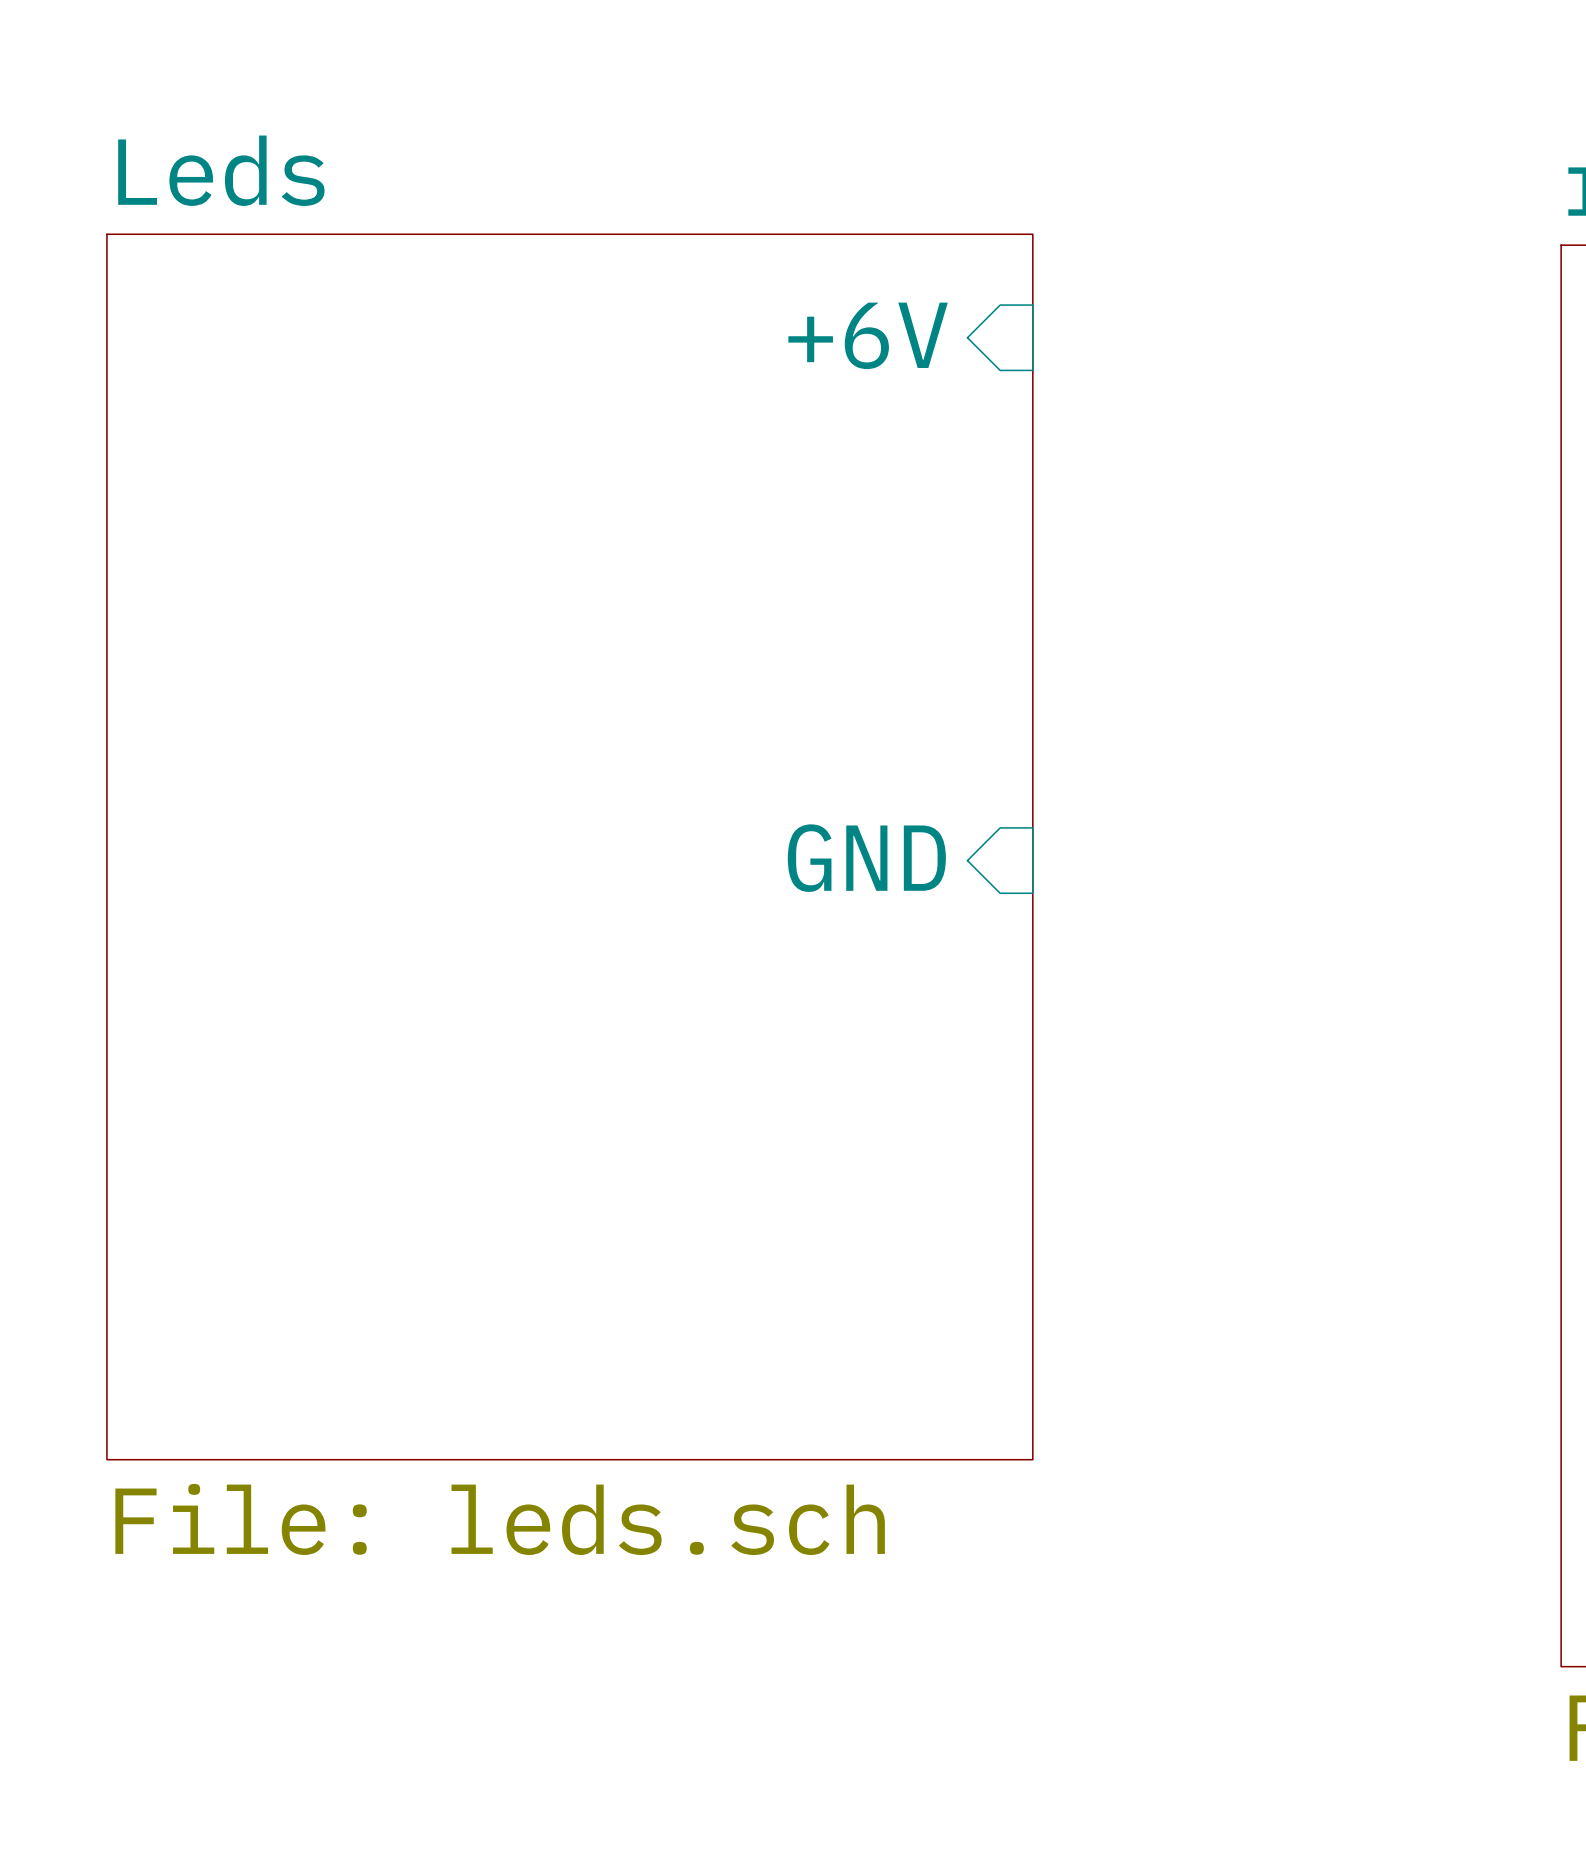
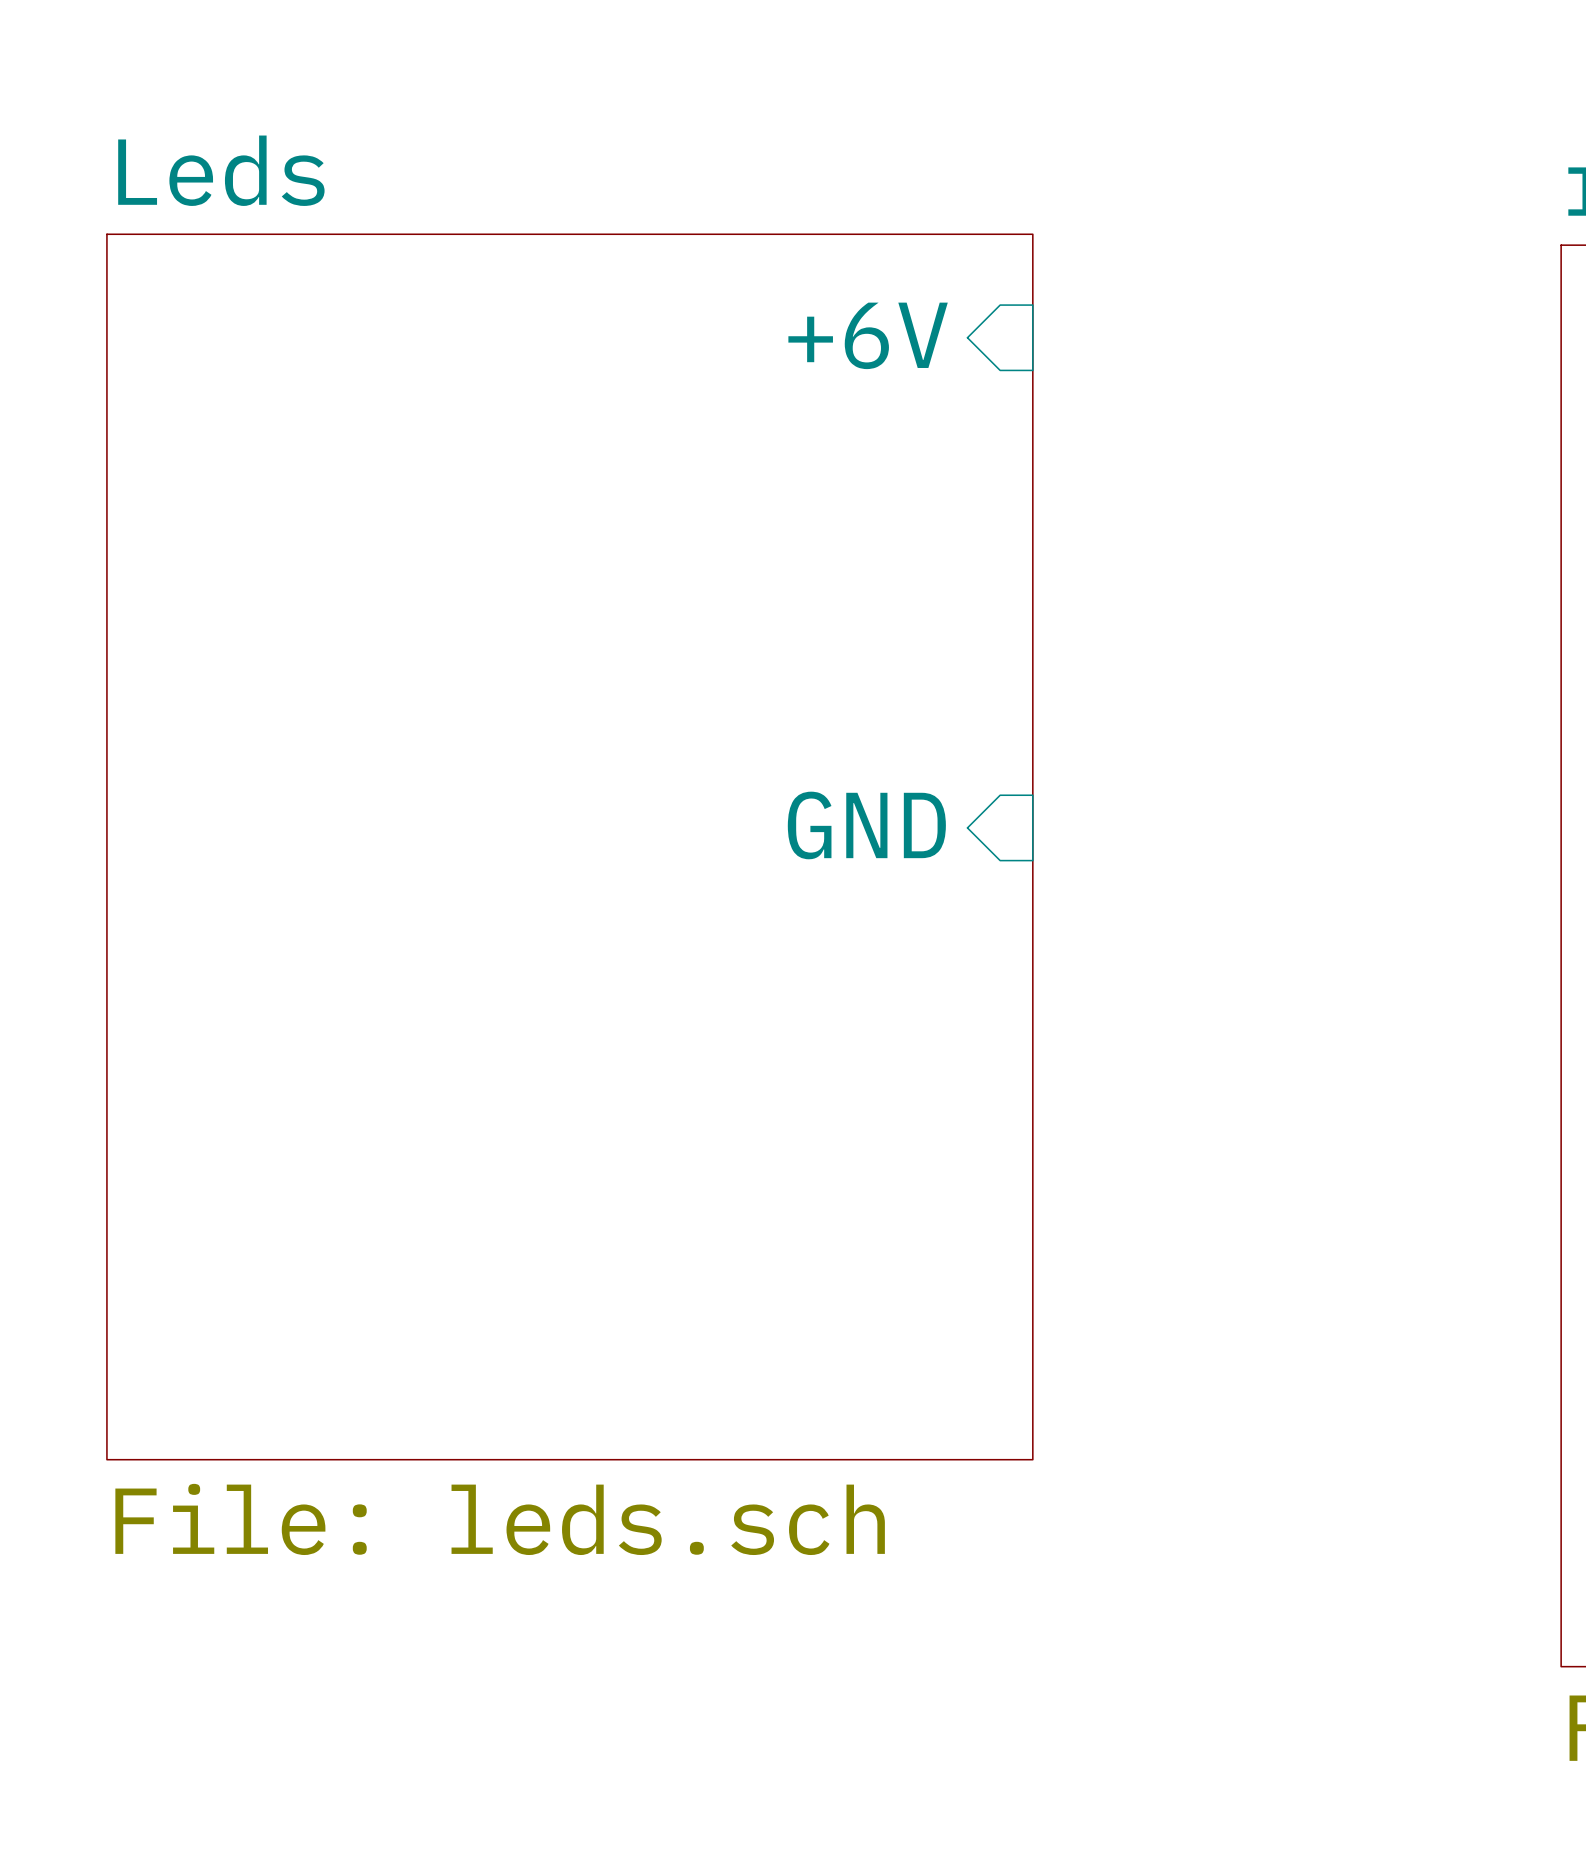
sheet pin position: GND (866, 858) -> GND (866, 825)

